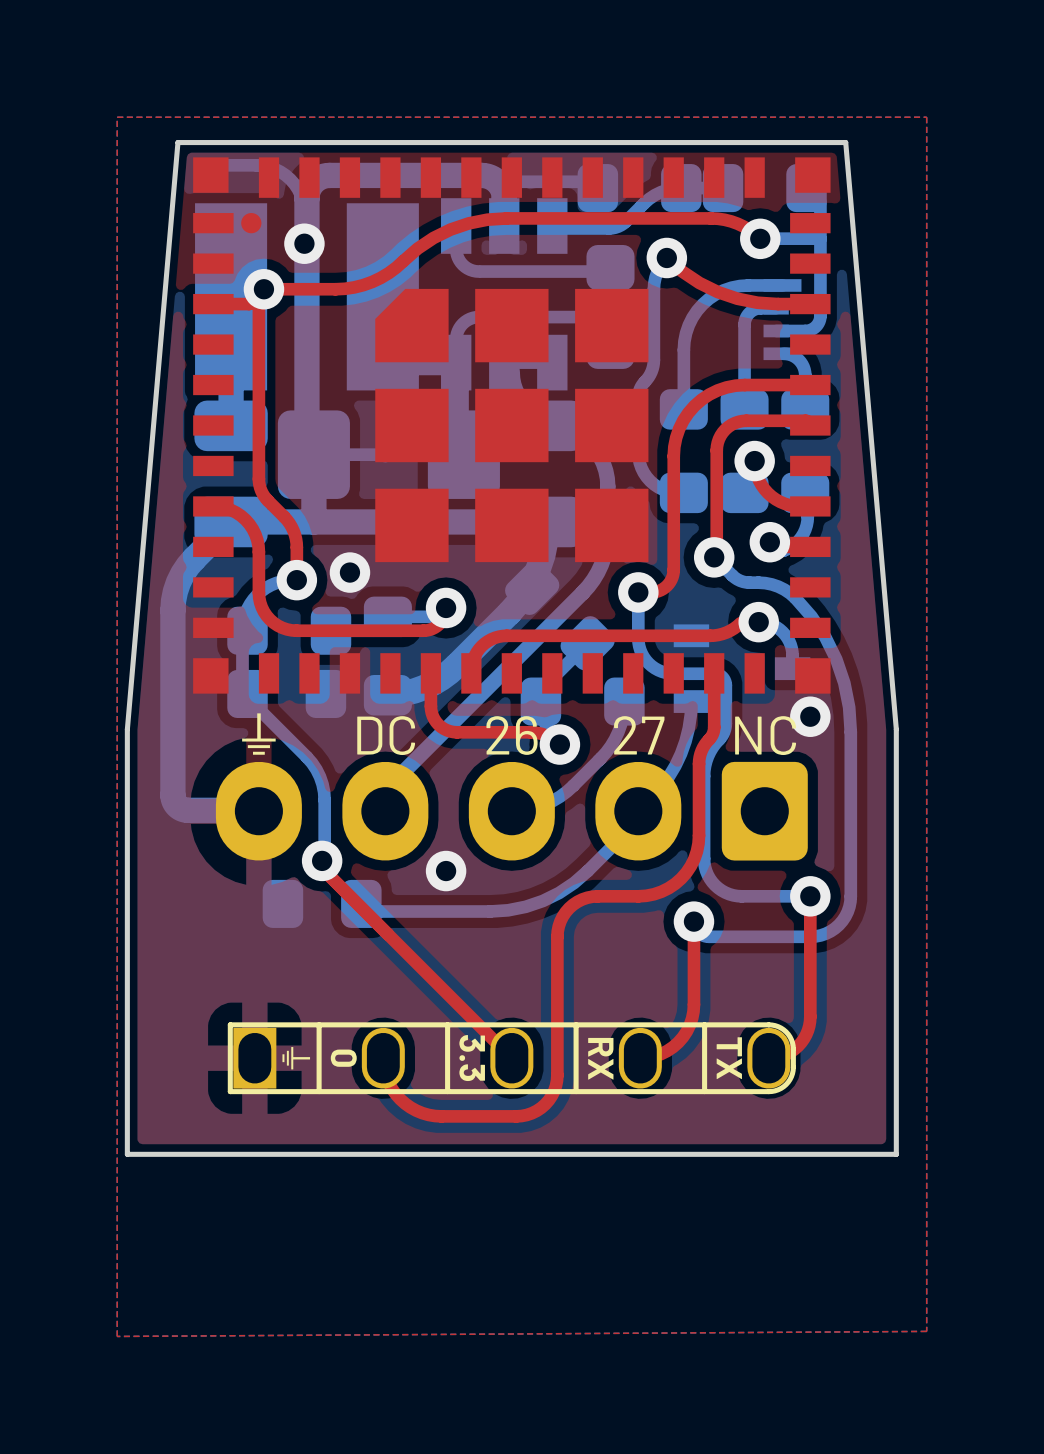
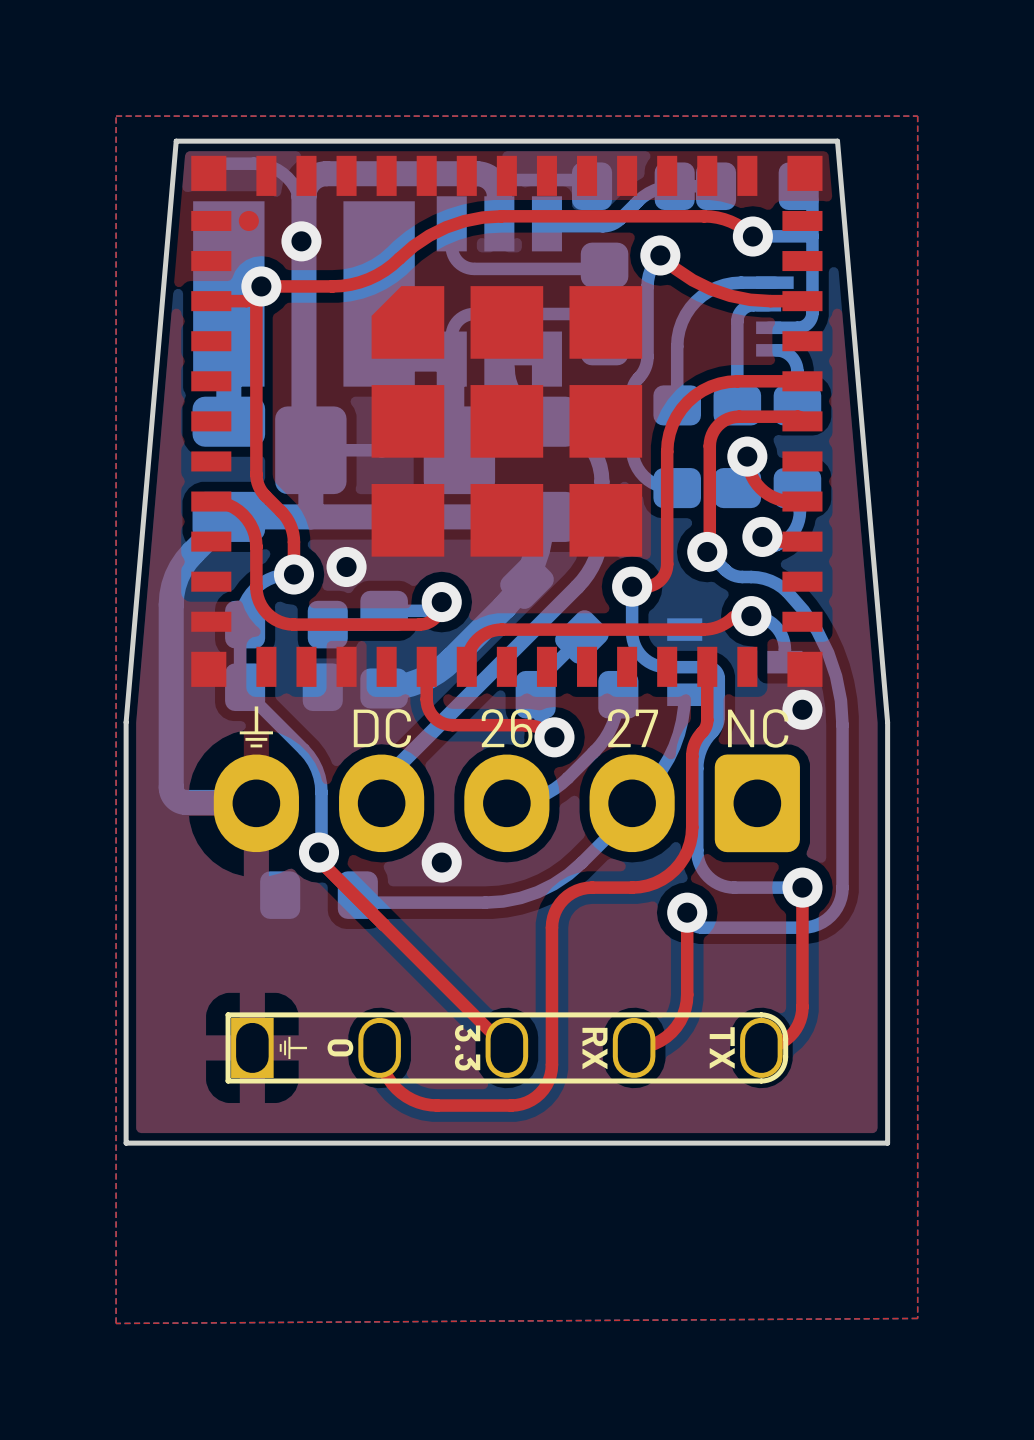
part footprint: [227, 1022, 796, 1095] -> [225, 1012, 789, 1084]

